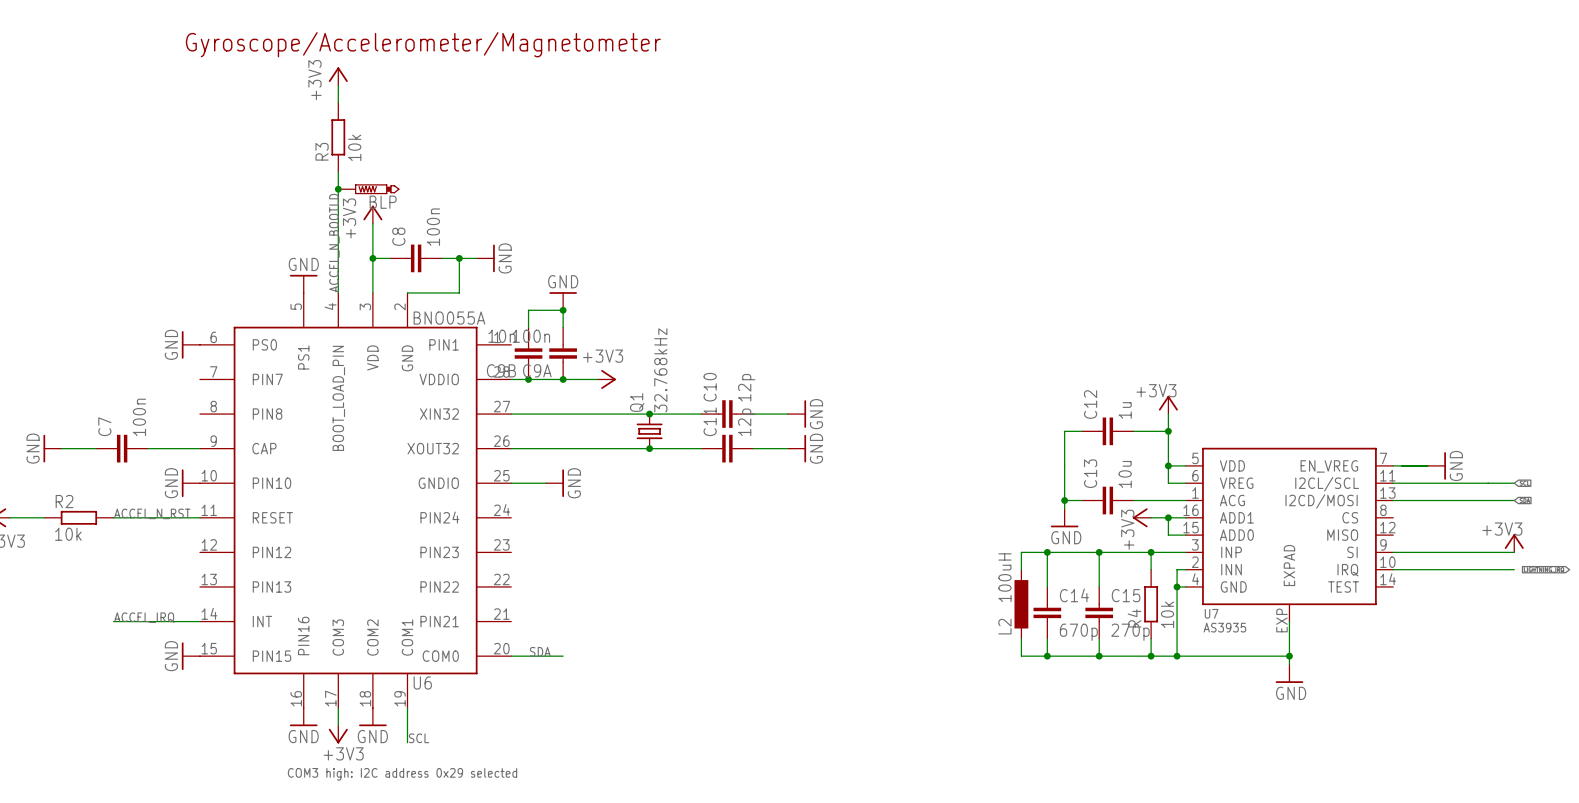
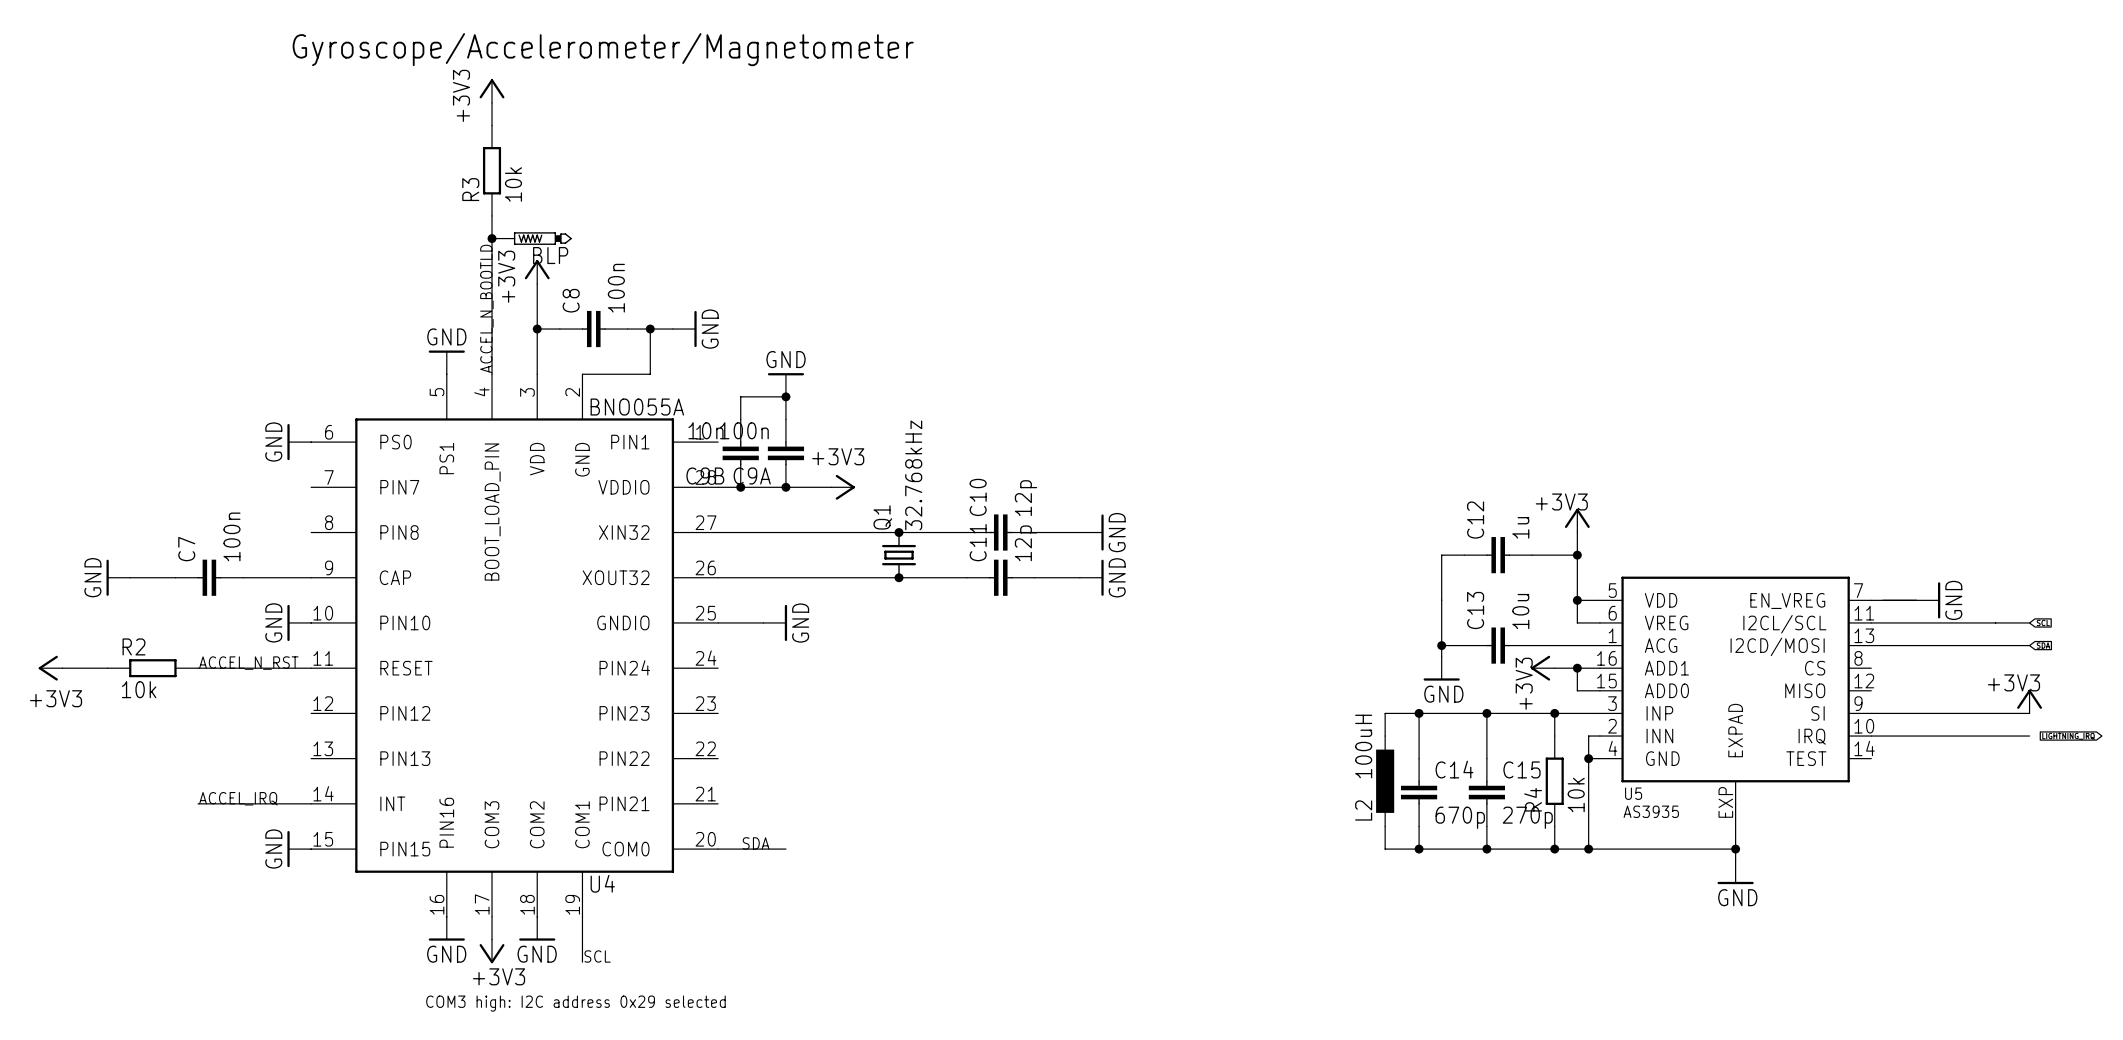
U7 name: U7 (1211, 613) -> U5 (1633, 793)
U6 name: U6 (422, 682) -> U4 (602, 883)

